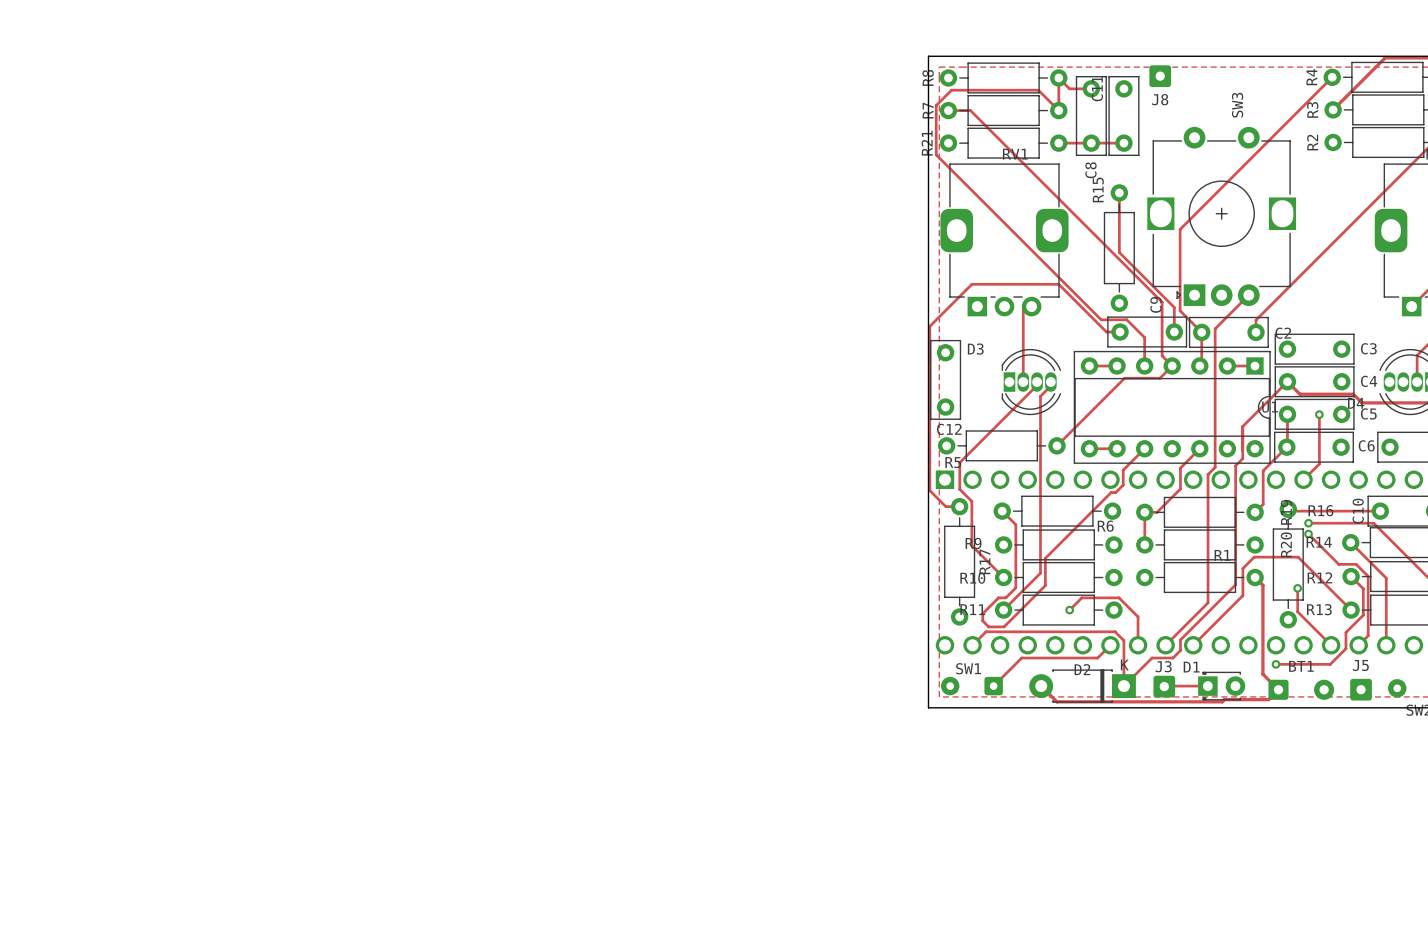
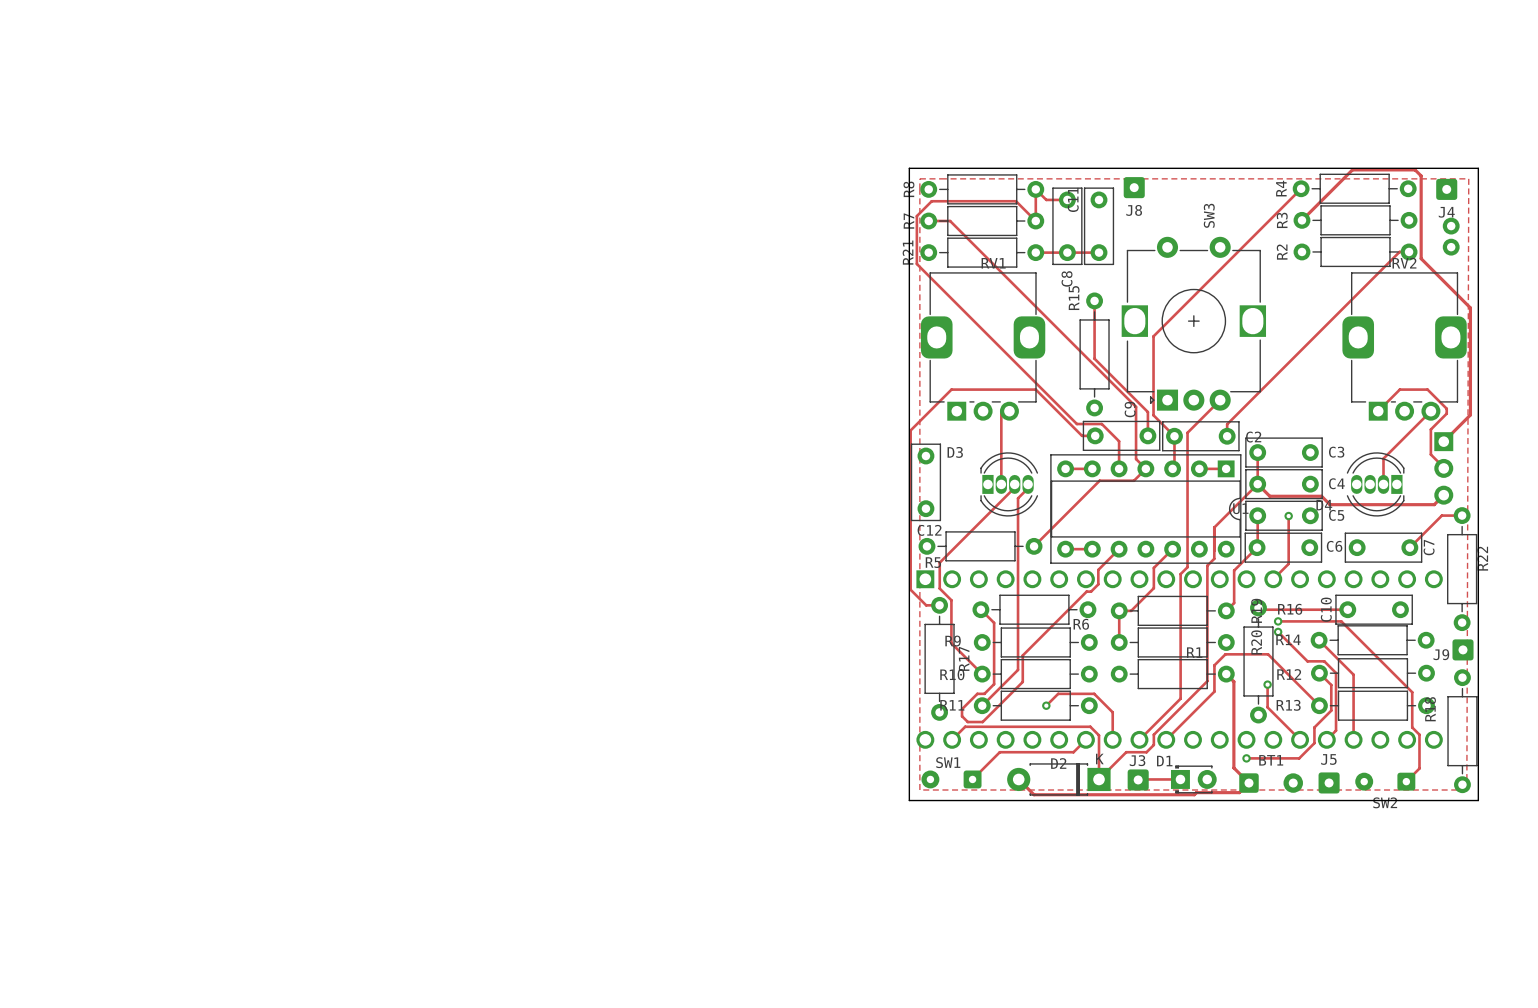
track: none -> (1257, 452) (1257, 484)

